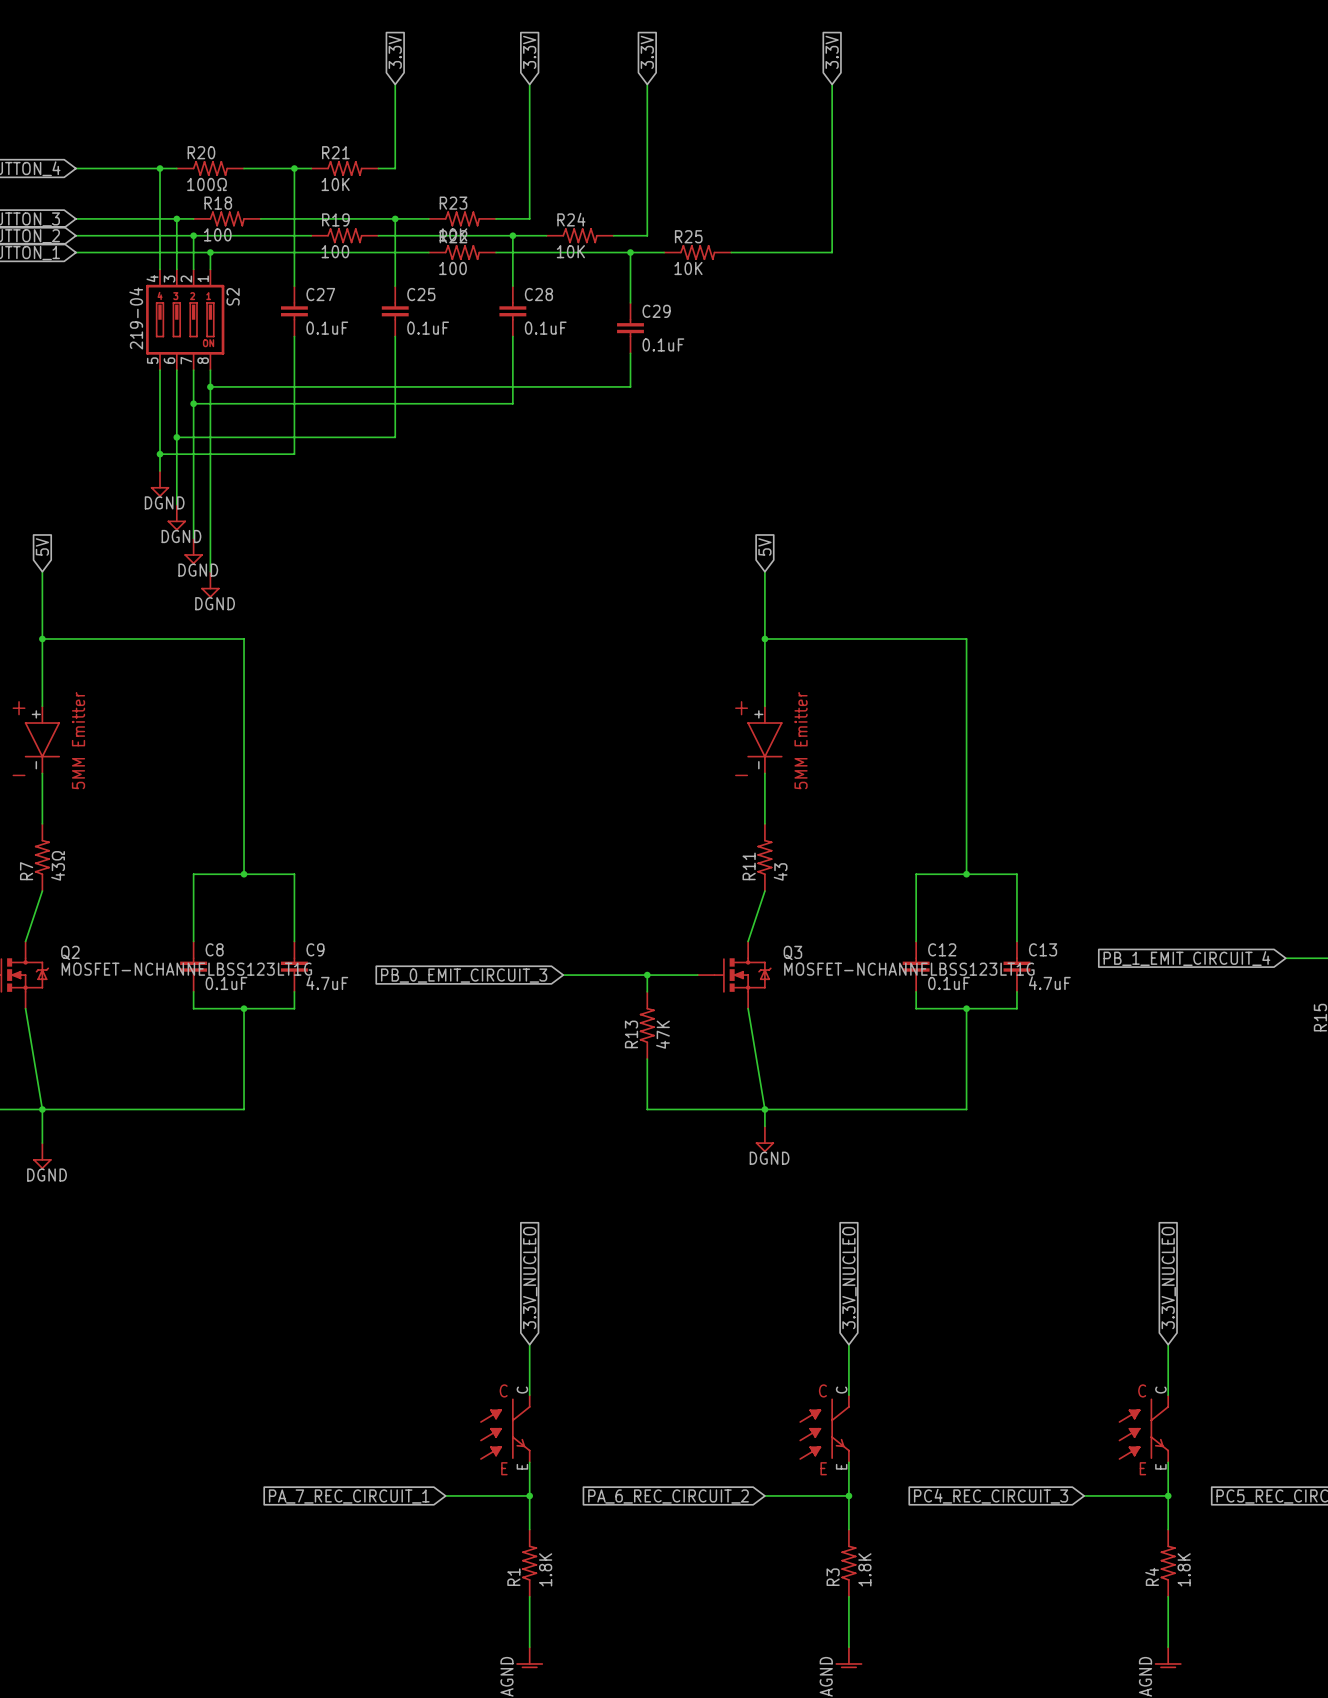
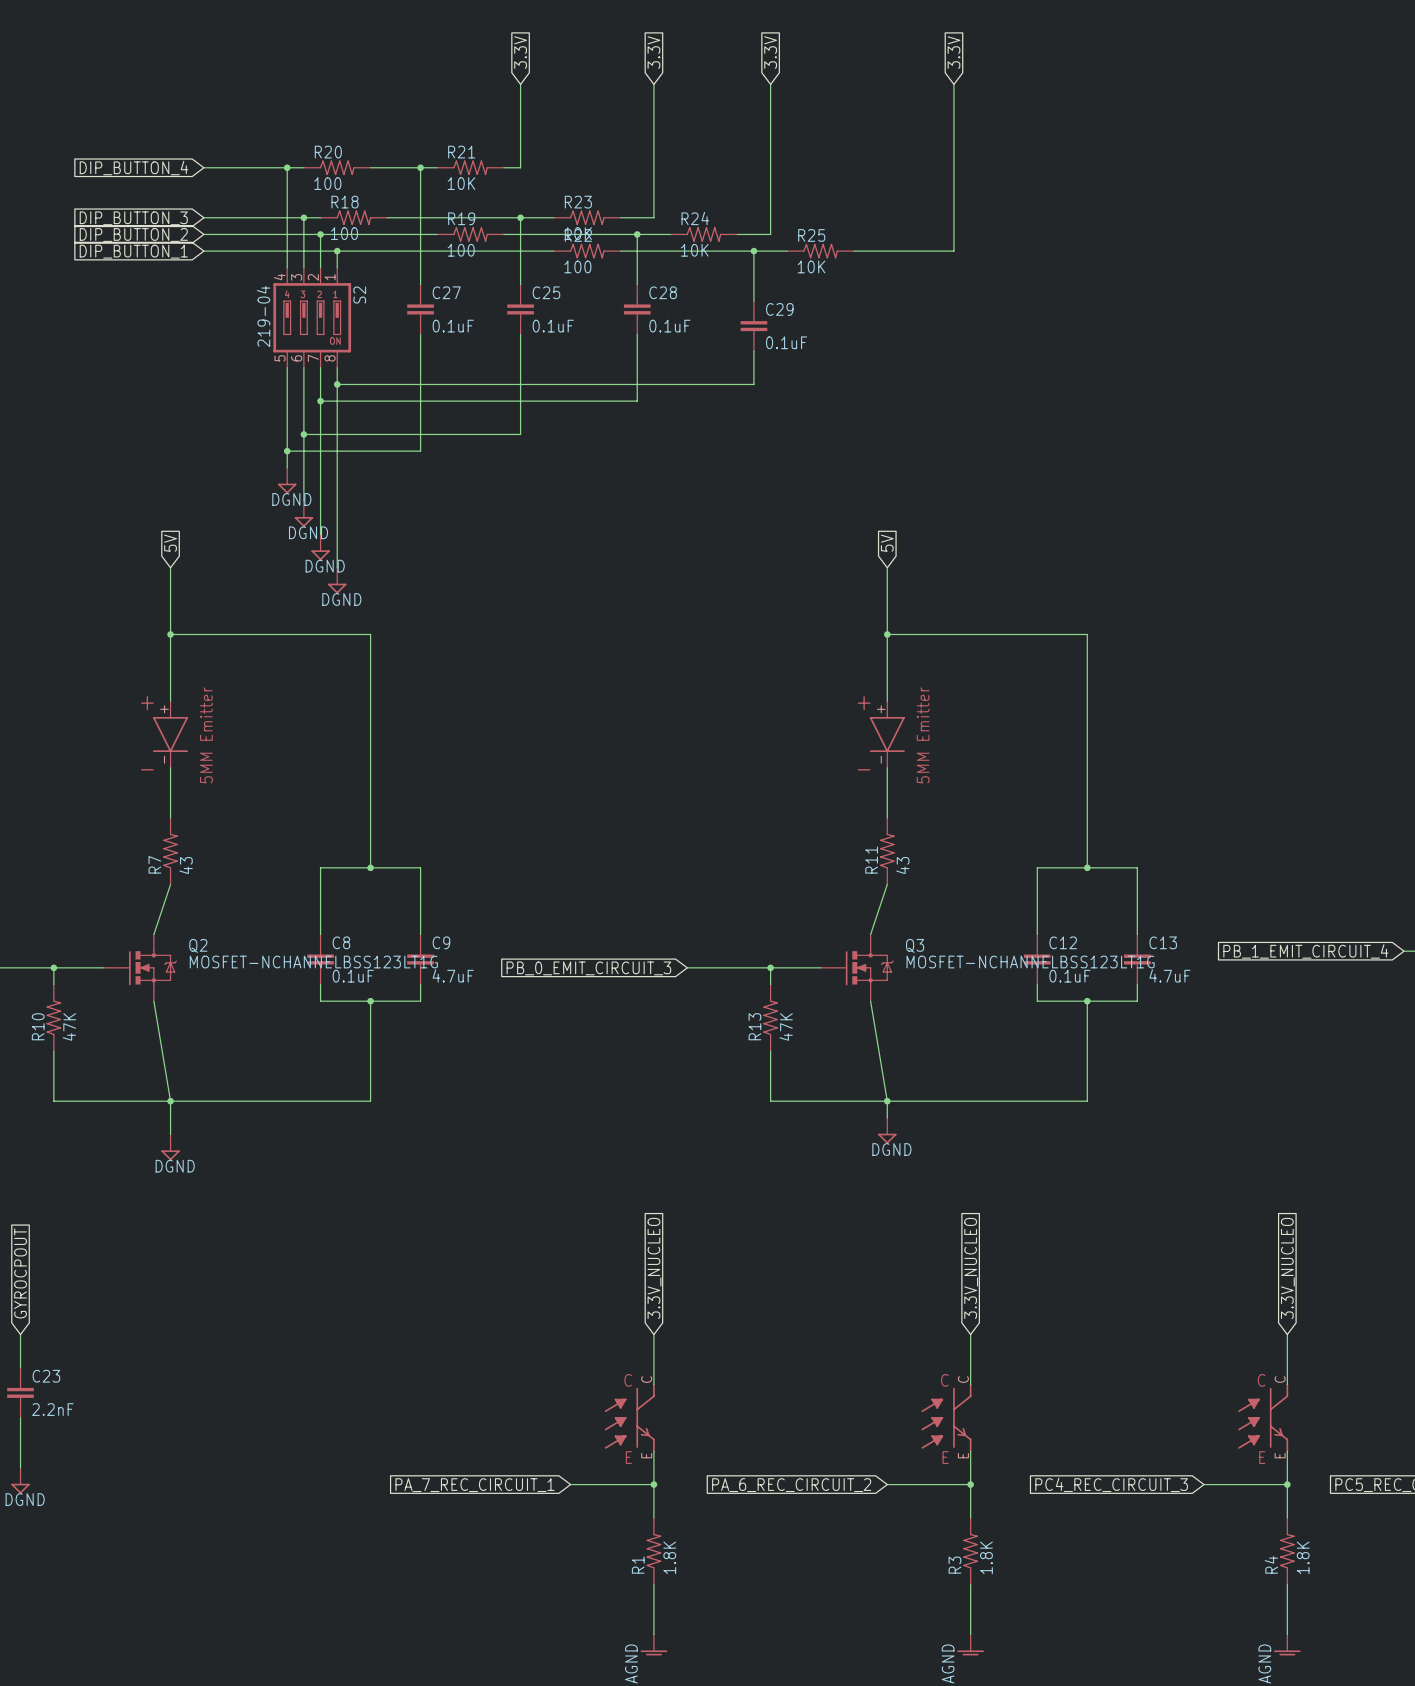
R20 value: 100Ω (207, 184) -> 100 (327, 183)
R7 value: 43Ω (58, 865) -> 43 (186, 865)

